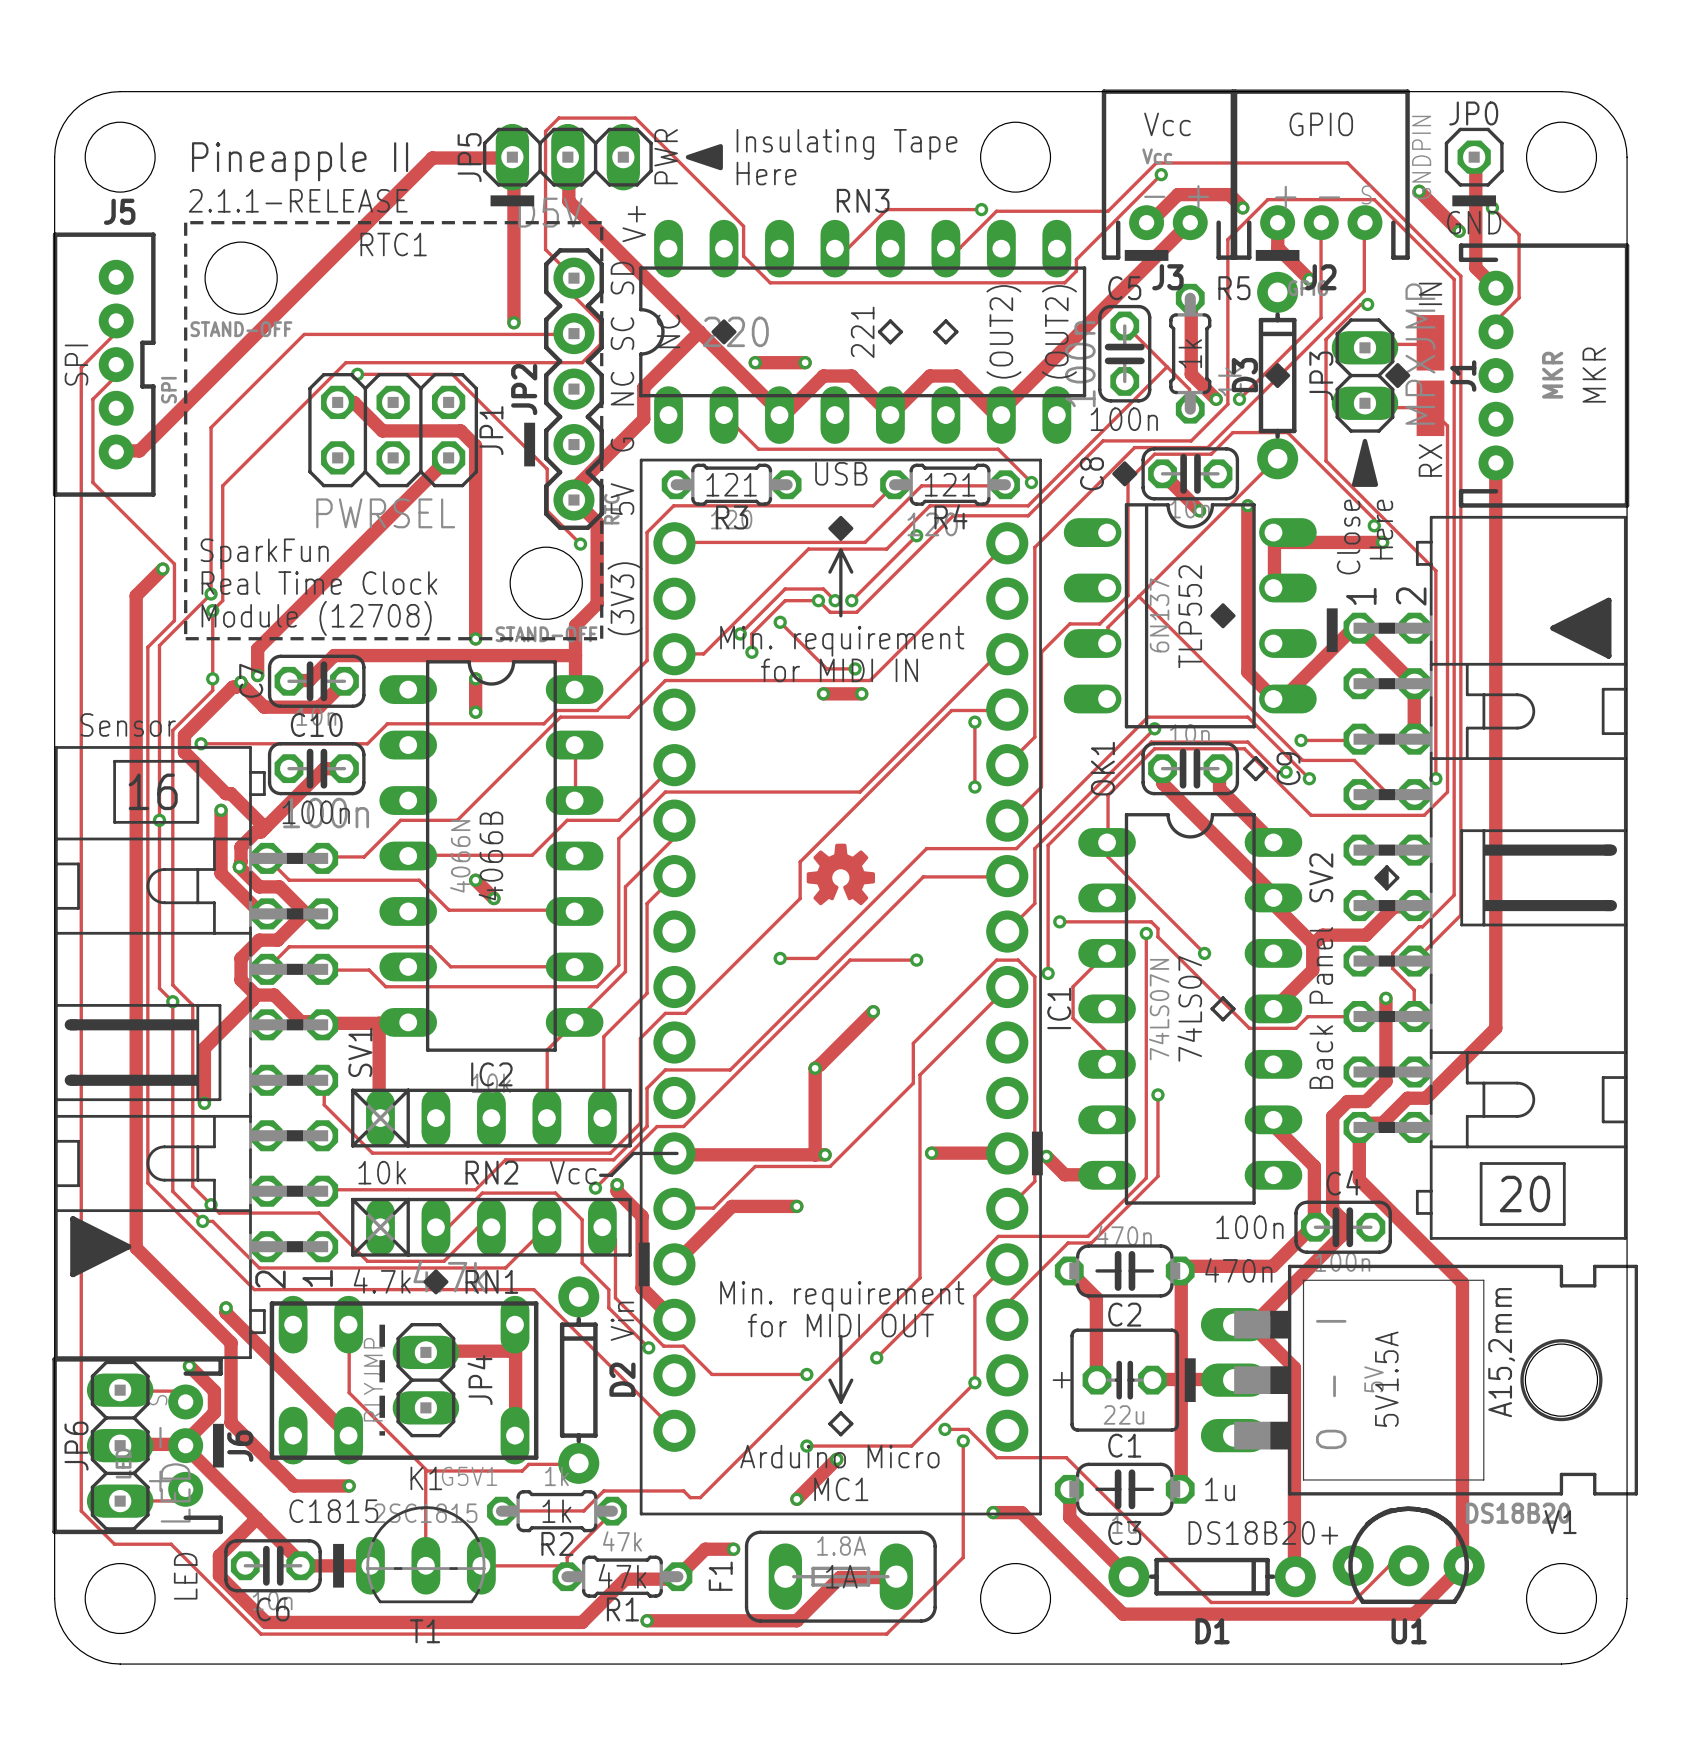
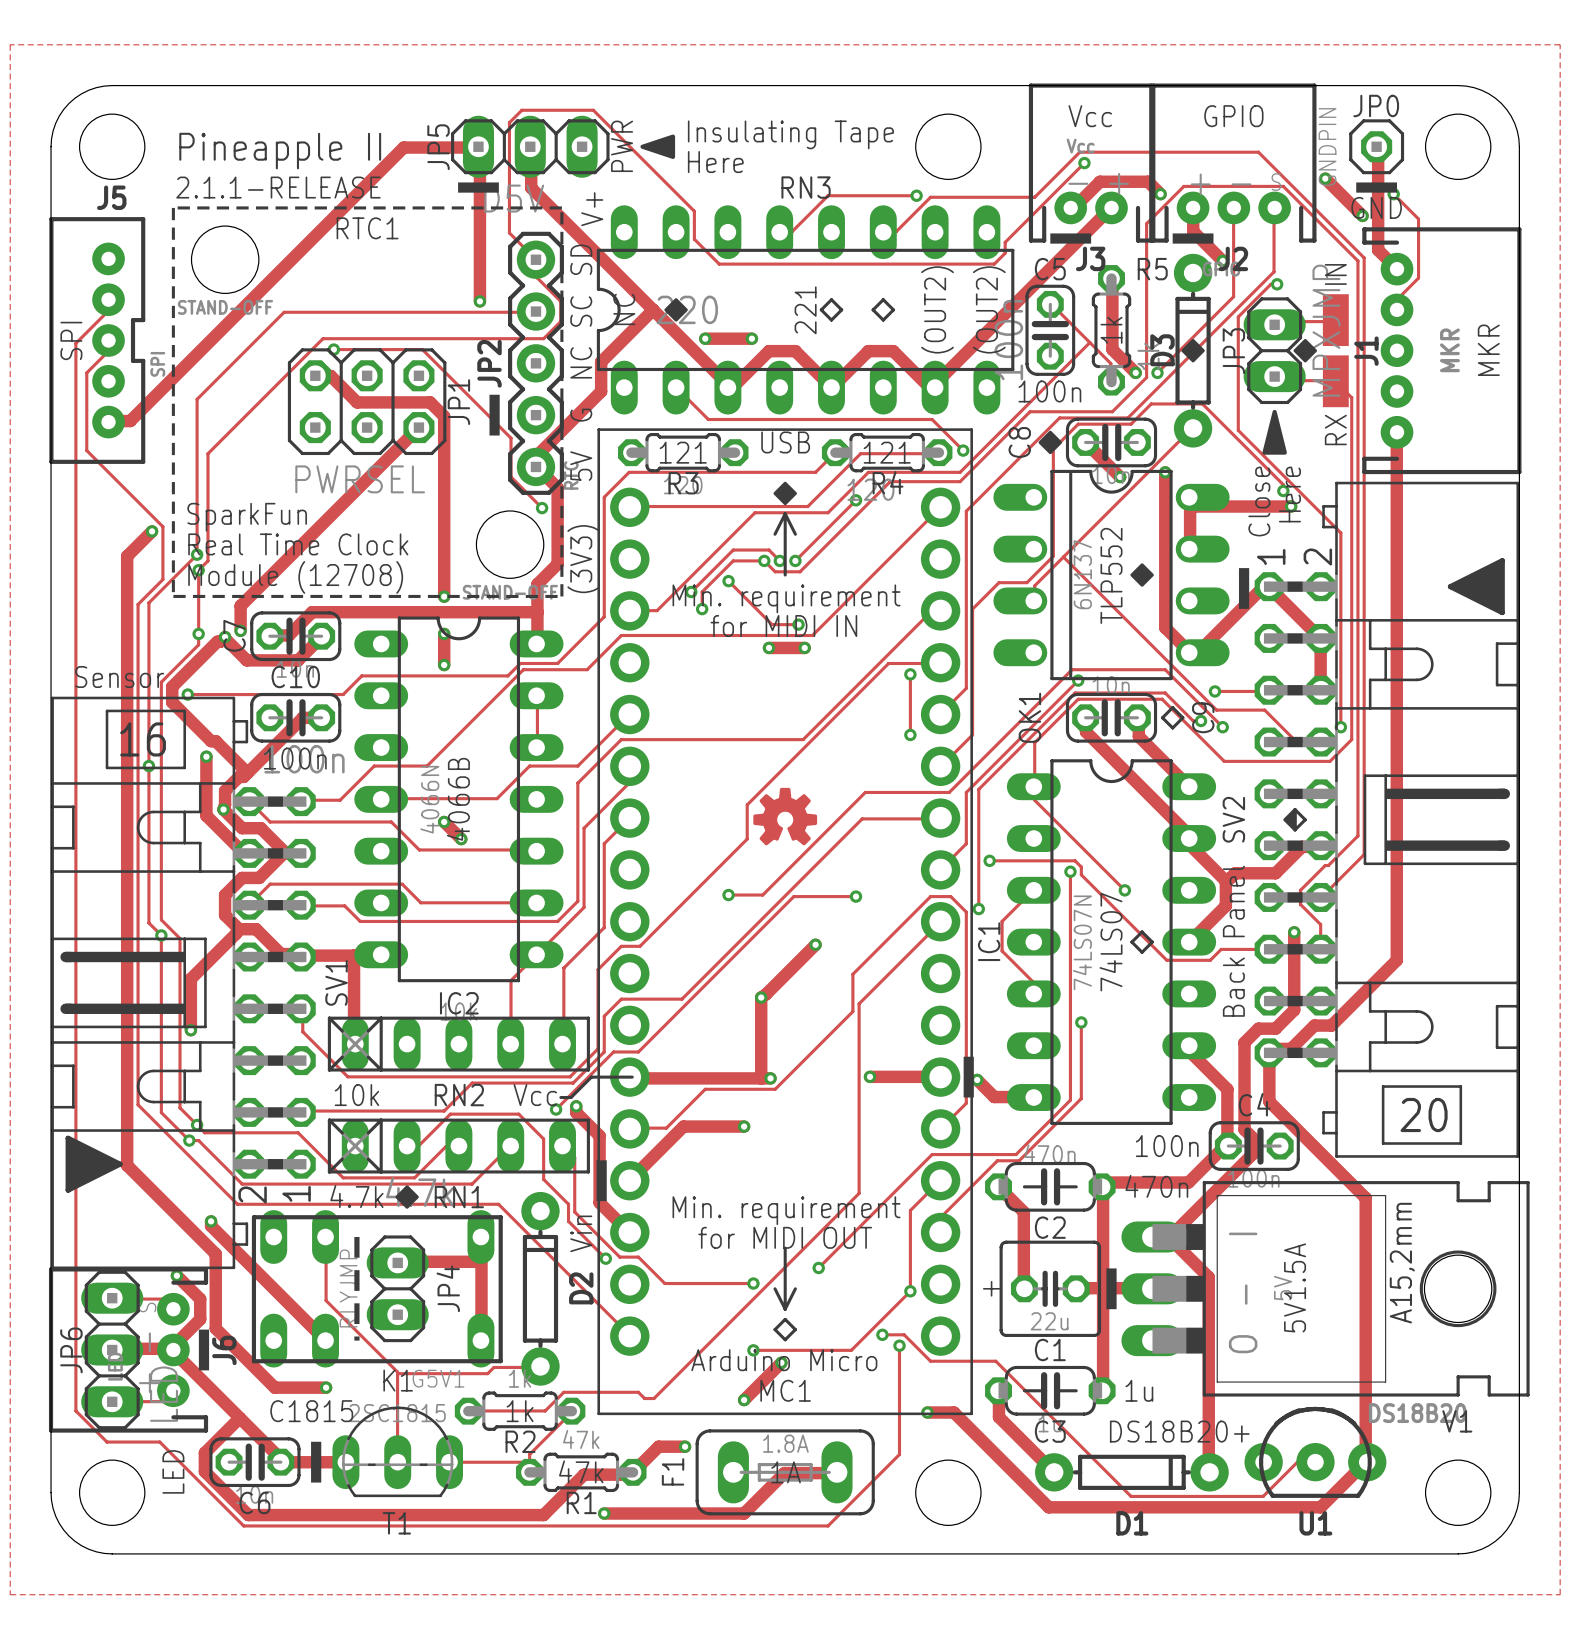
zone outline: none -> (10, 44) (1560, 44) (1560, 1594) (10, 1594) (10, 44)

